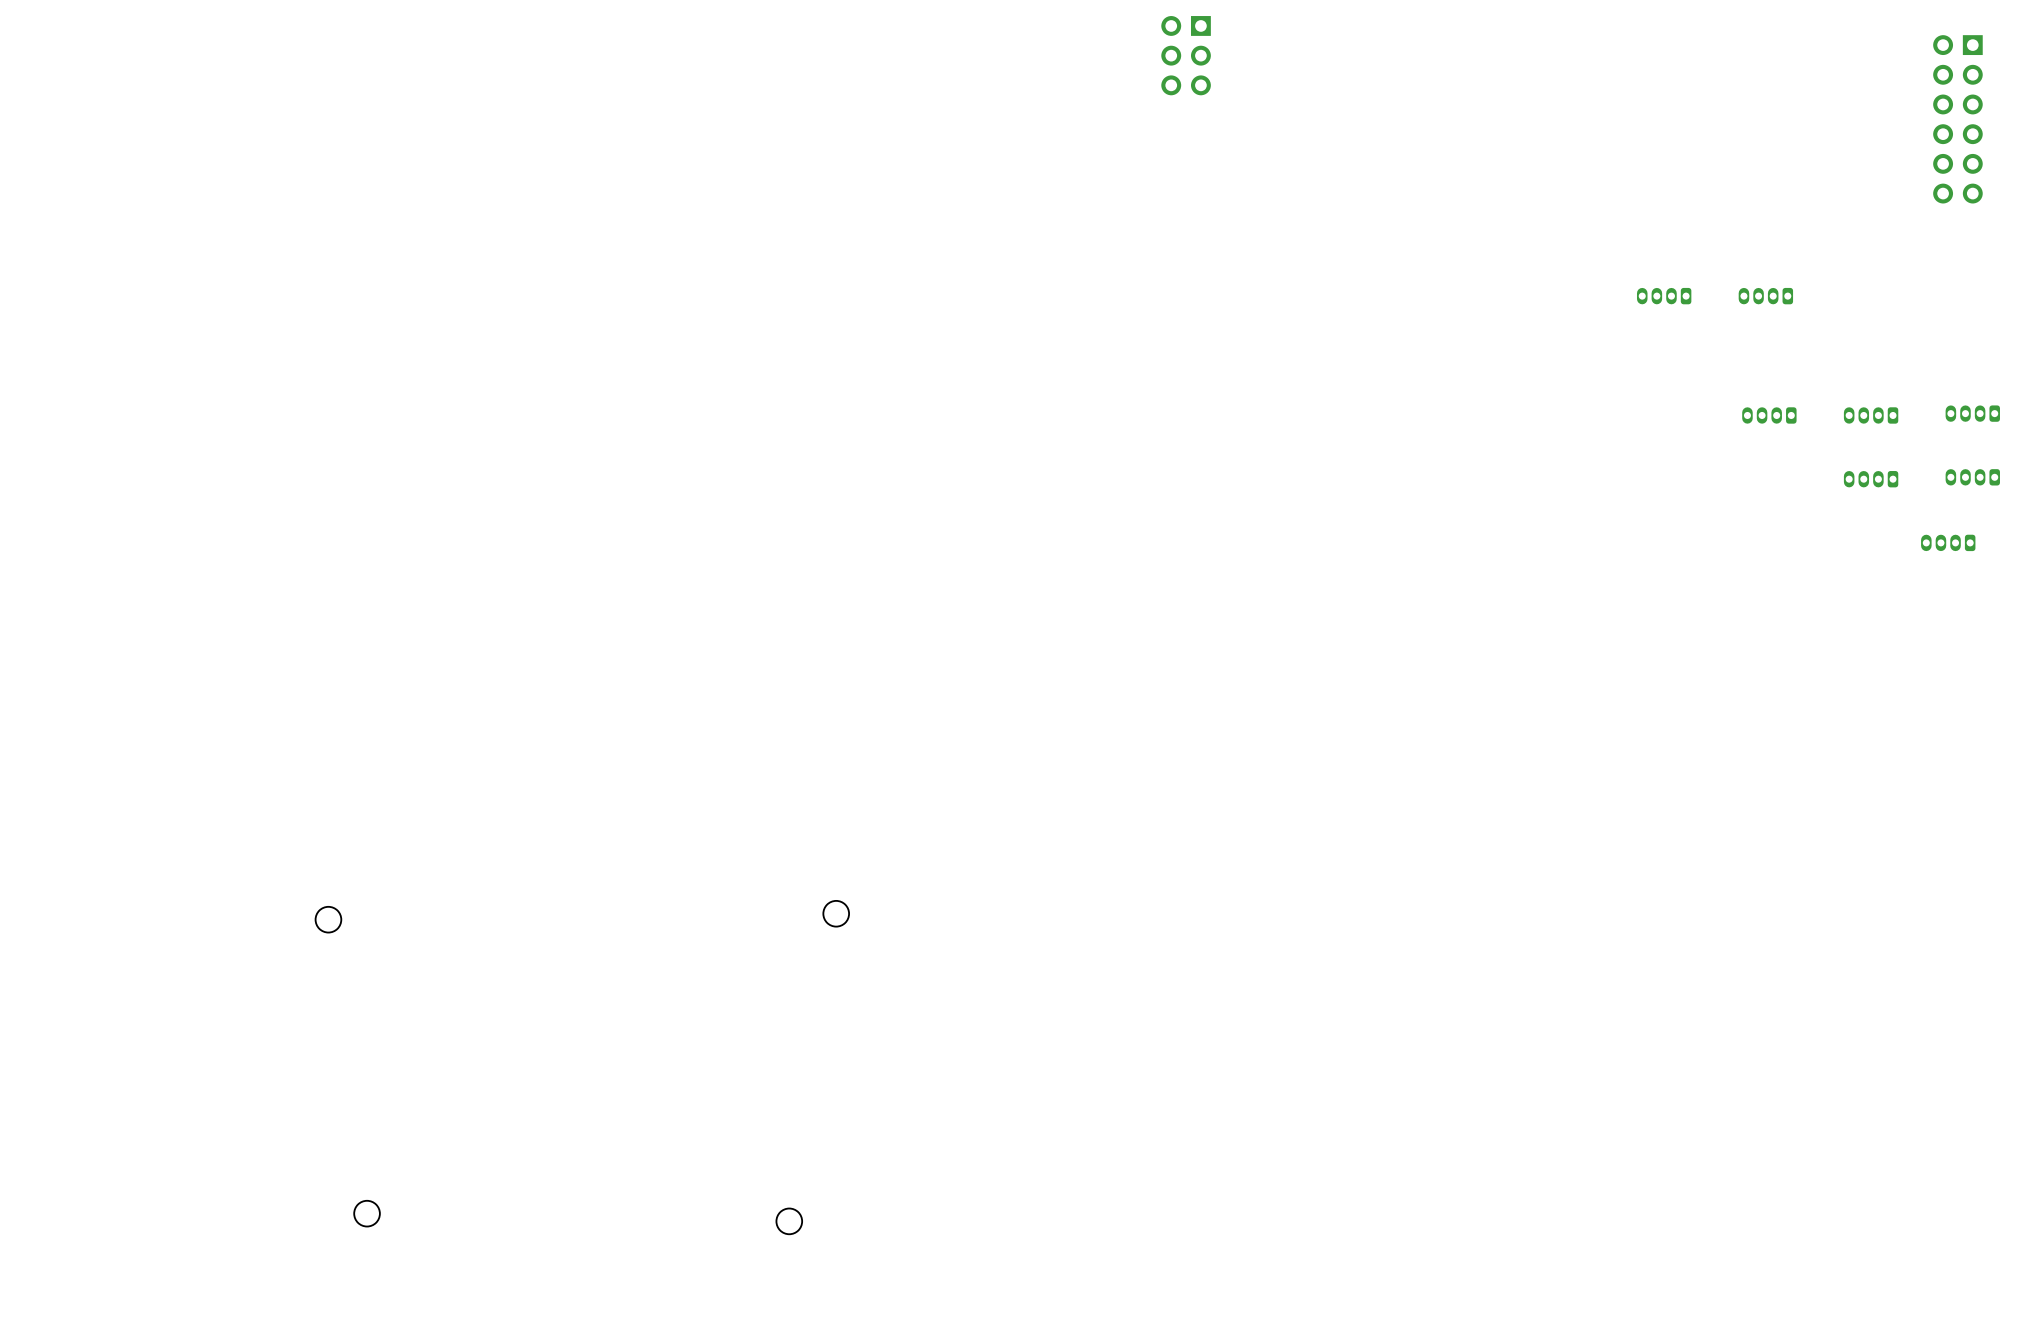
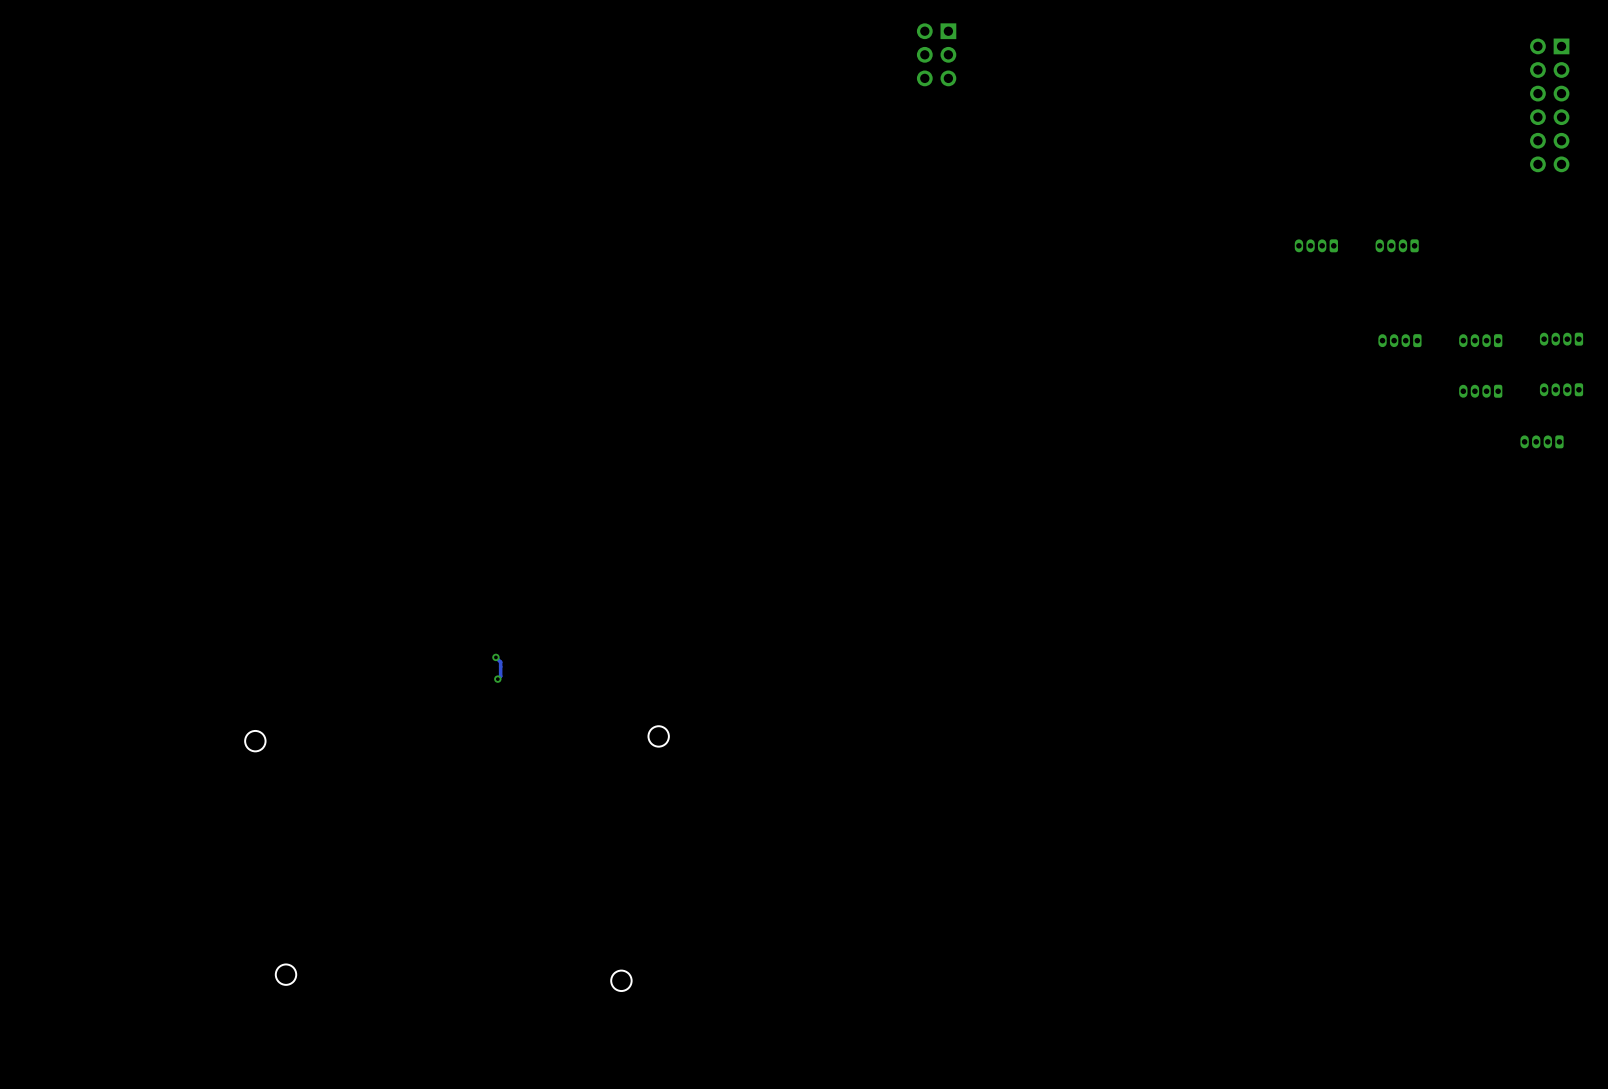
track: none -> (495, 657) (500, 662) (500, 676) (497, 679)
via: none -> (495, 657)
via: none -> (497, 679)

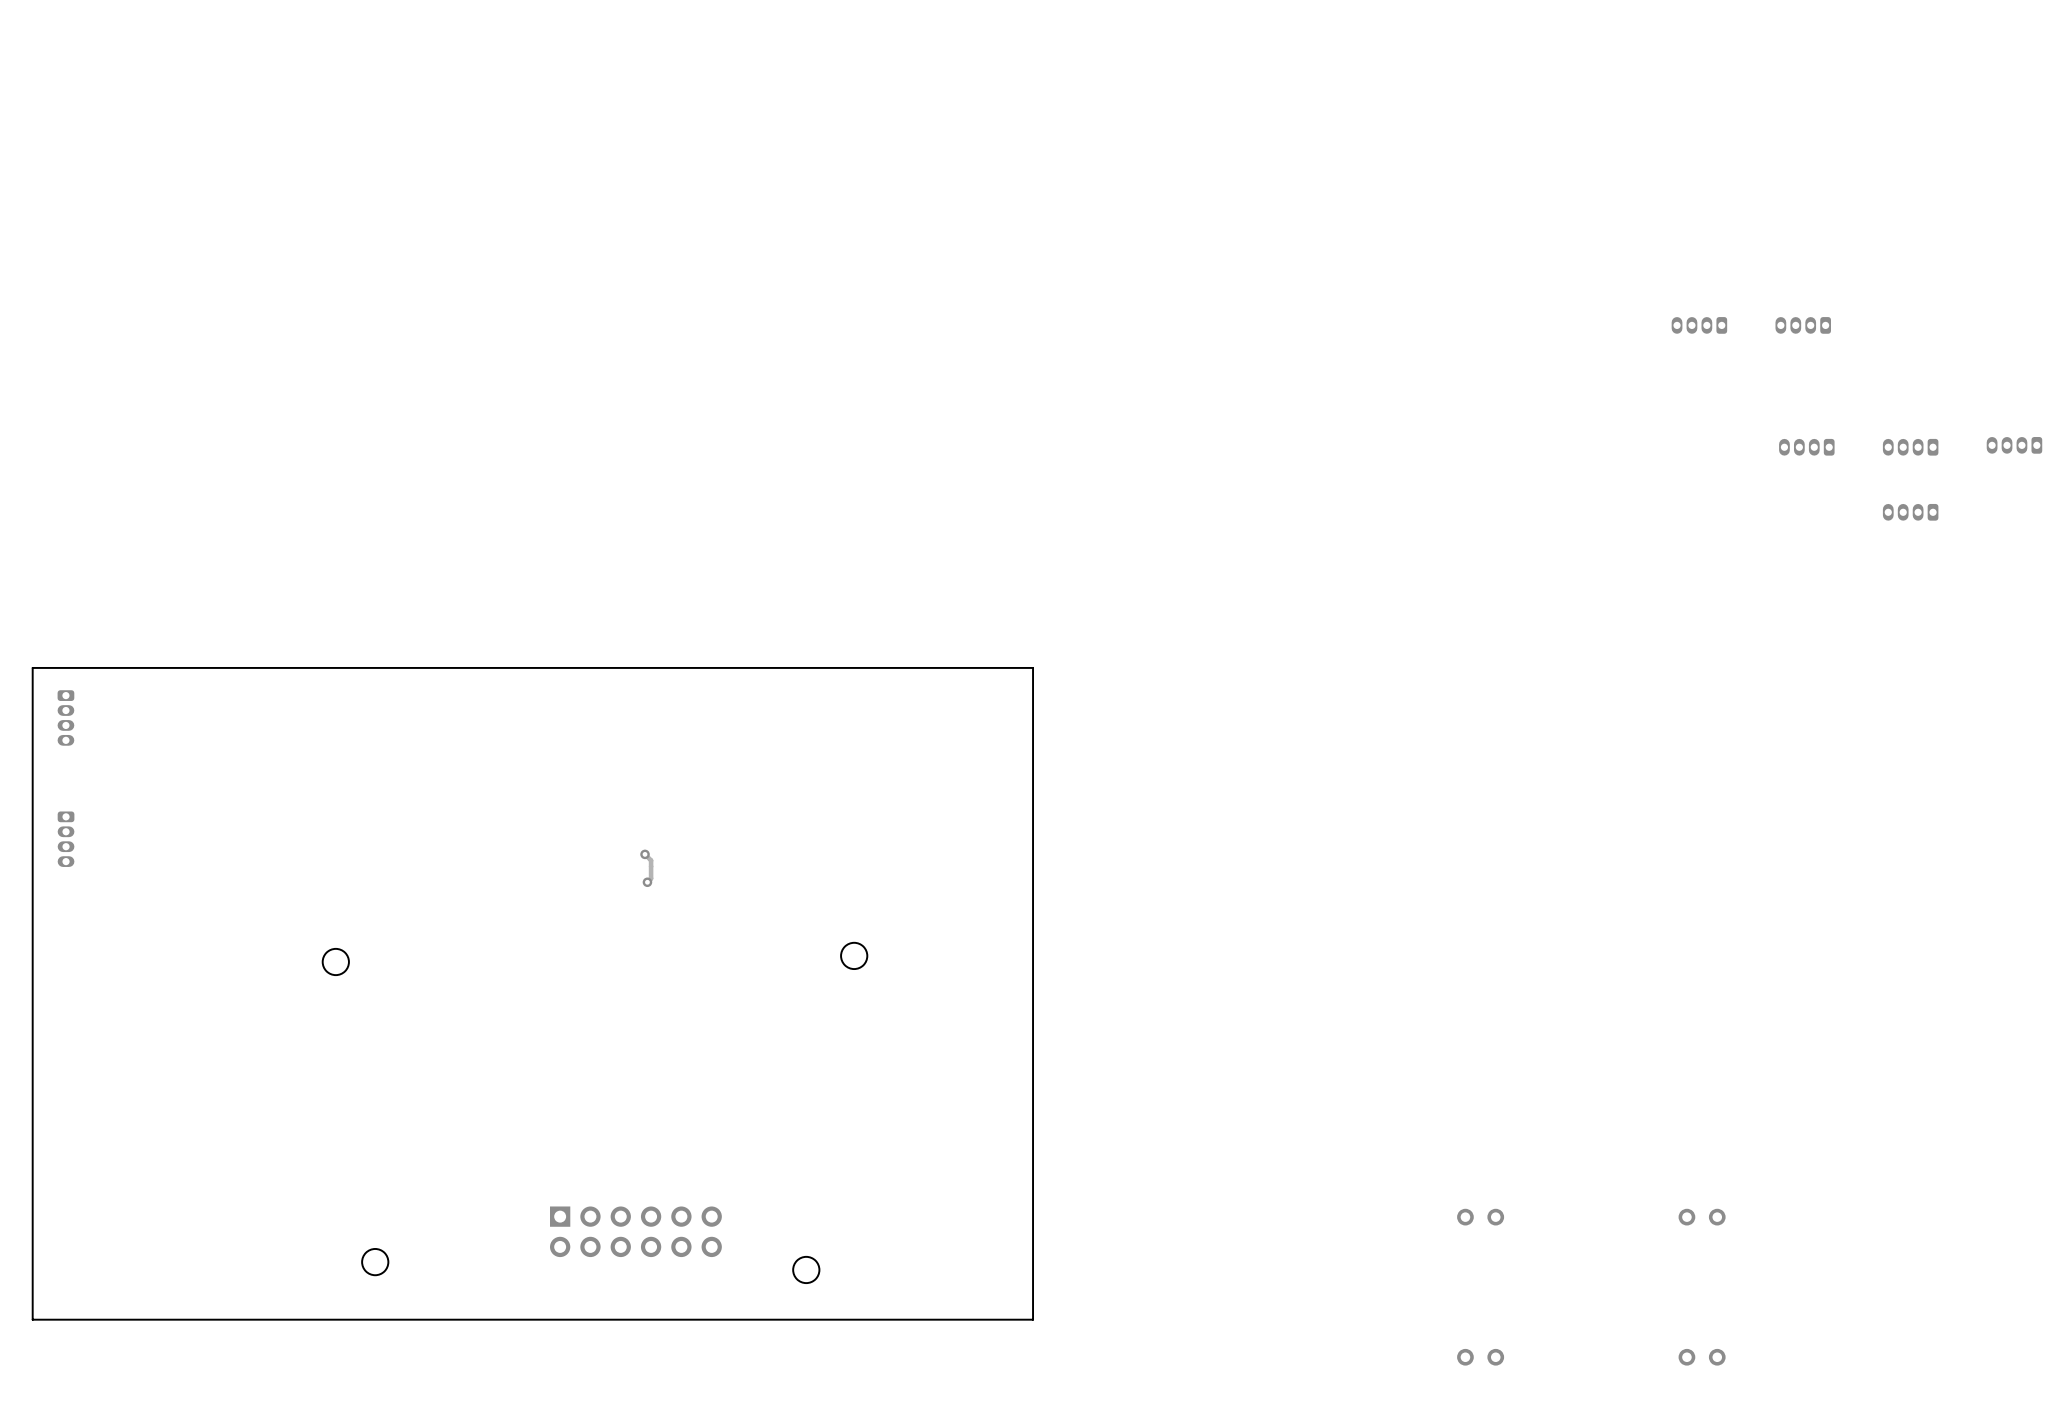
part: (936, 54) -> none
part: (1549, 105) -> none
part: (1561, 389) -> none
part: (1542, 441) -> none
board edge: none -> (1033, 667) (32, 667) (32, 1319) (1033, 1319) (1033, 667)
part: none -> (65, 717)
part: none -> (66, 839)
part: none -> (1480, 1217)
part: none -> (1702, 1217)
part: none -> (635, 1231)
part: none -> (1480, 1357)
part: none -> (1702, 1357)

